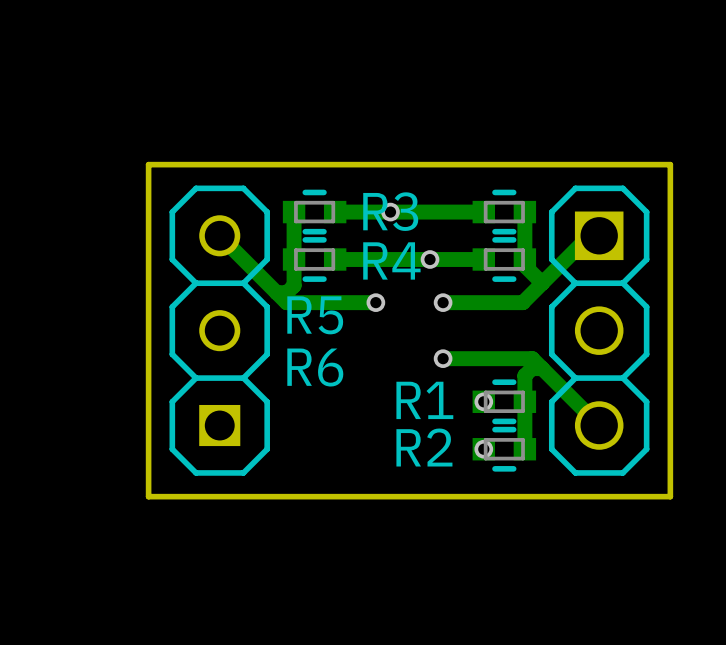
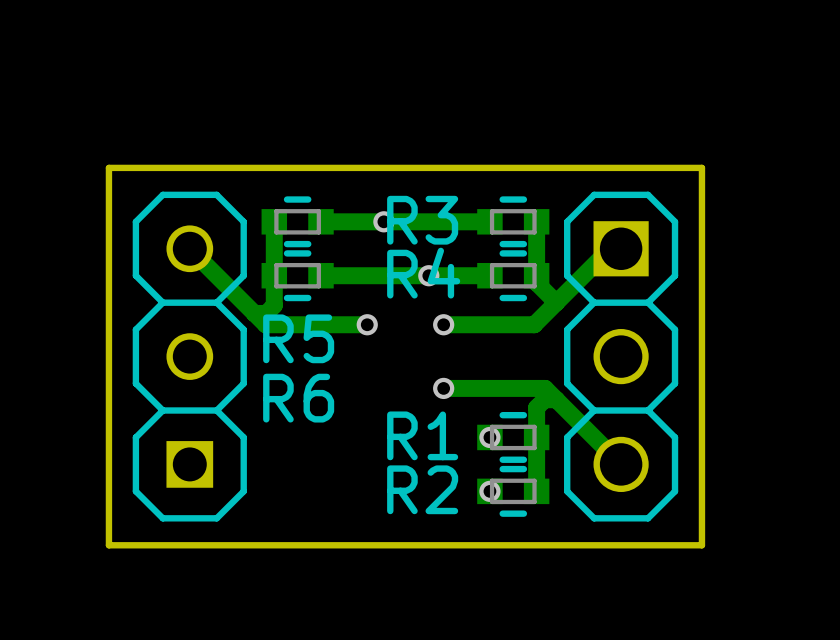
R3 name position: R3 (390, 211) -> R3 (422, 220)
R4 name position: R4 (391, 260) -> R4 (423, 273)

